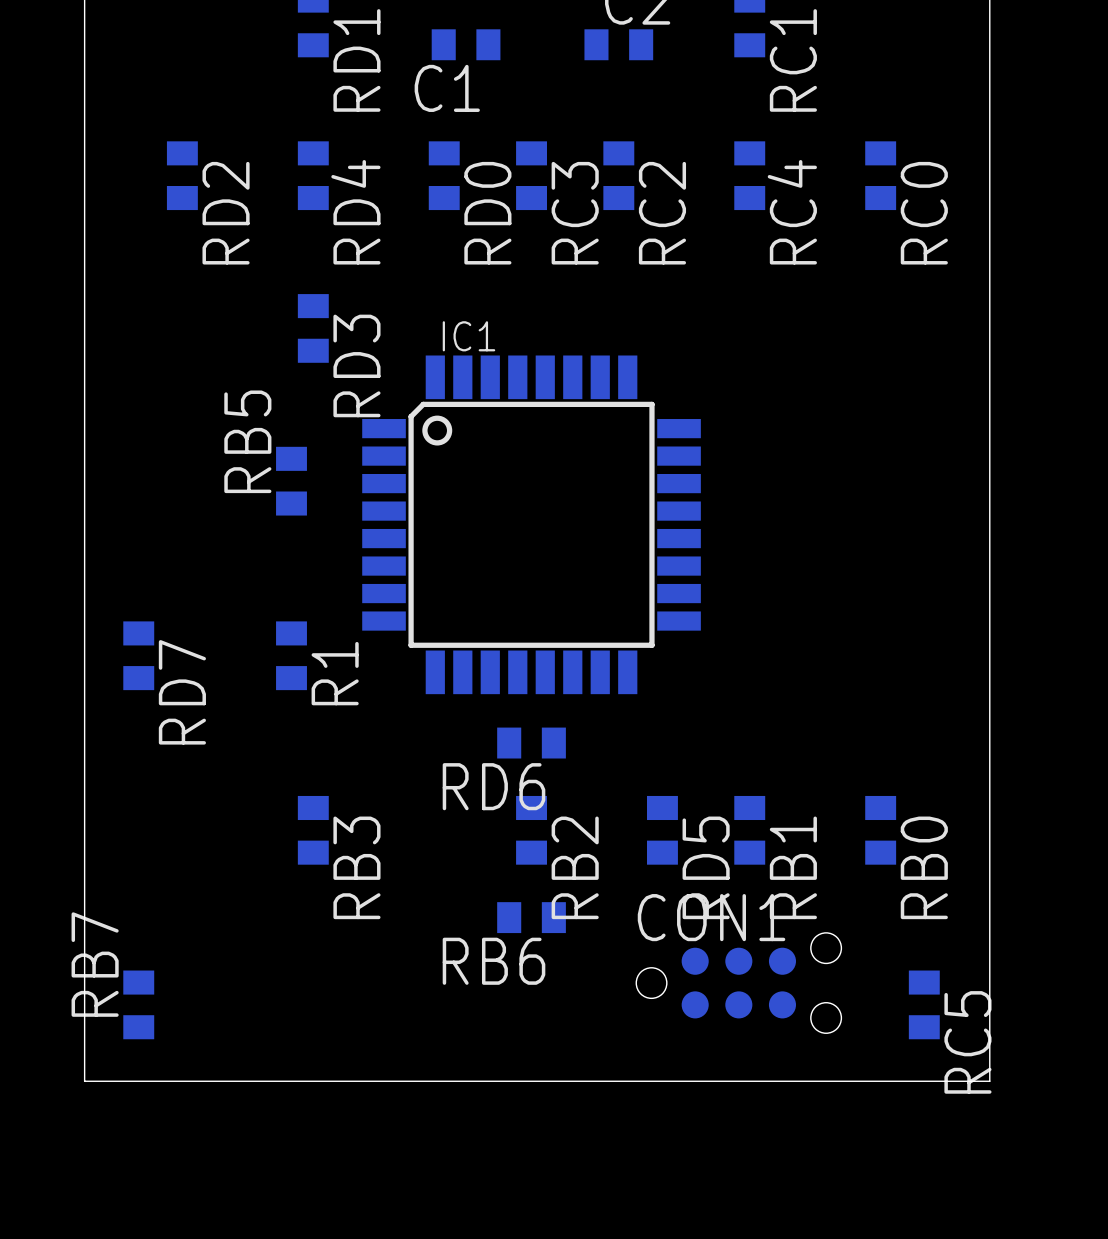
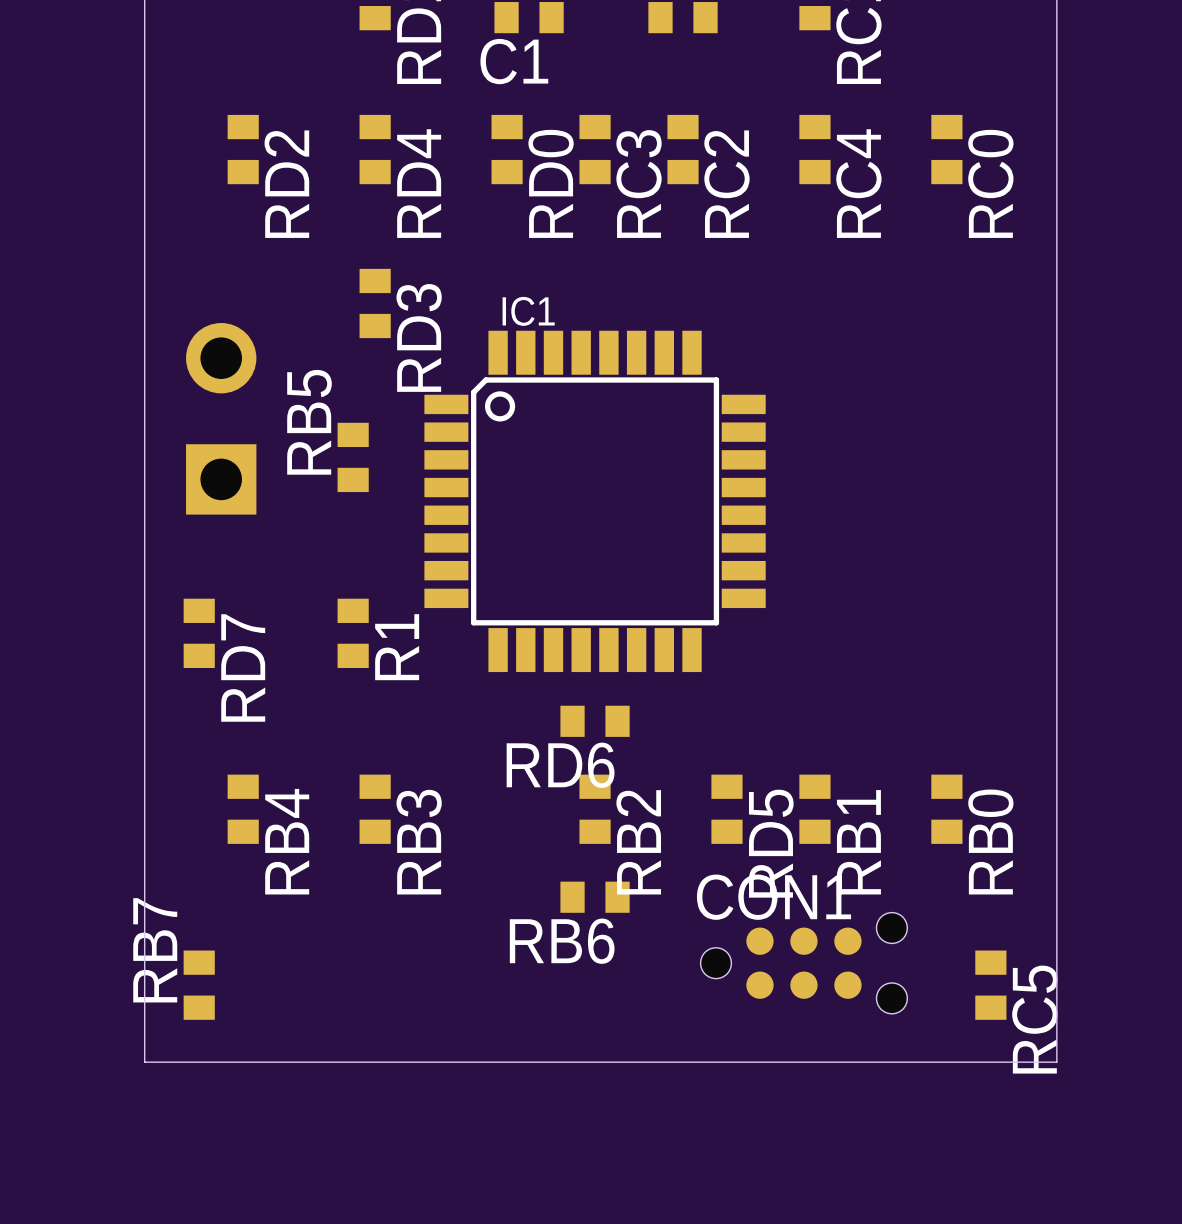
part: none -> (221, 418)
RB4: none -> (243, 809)

